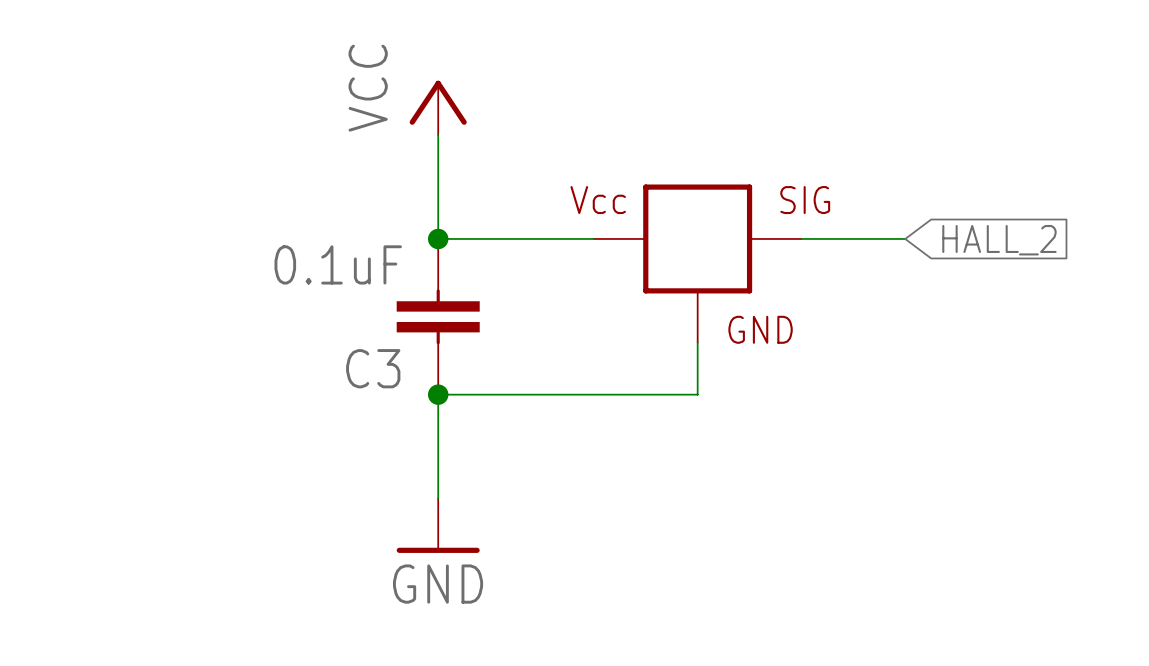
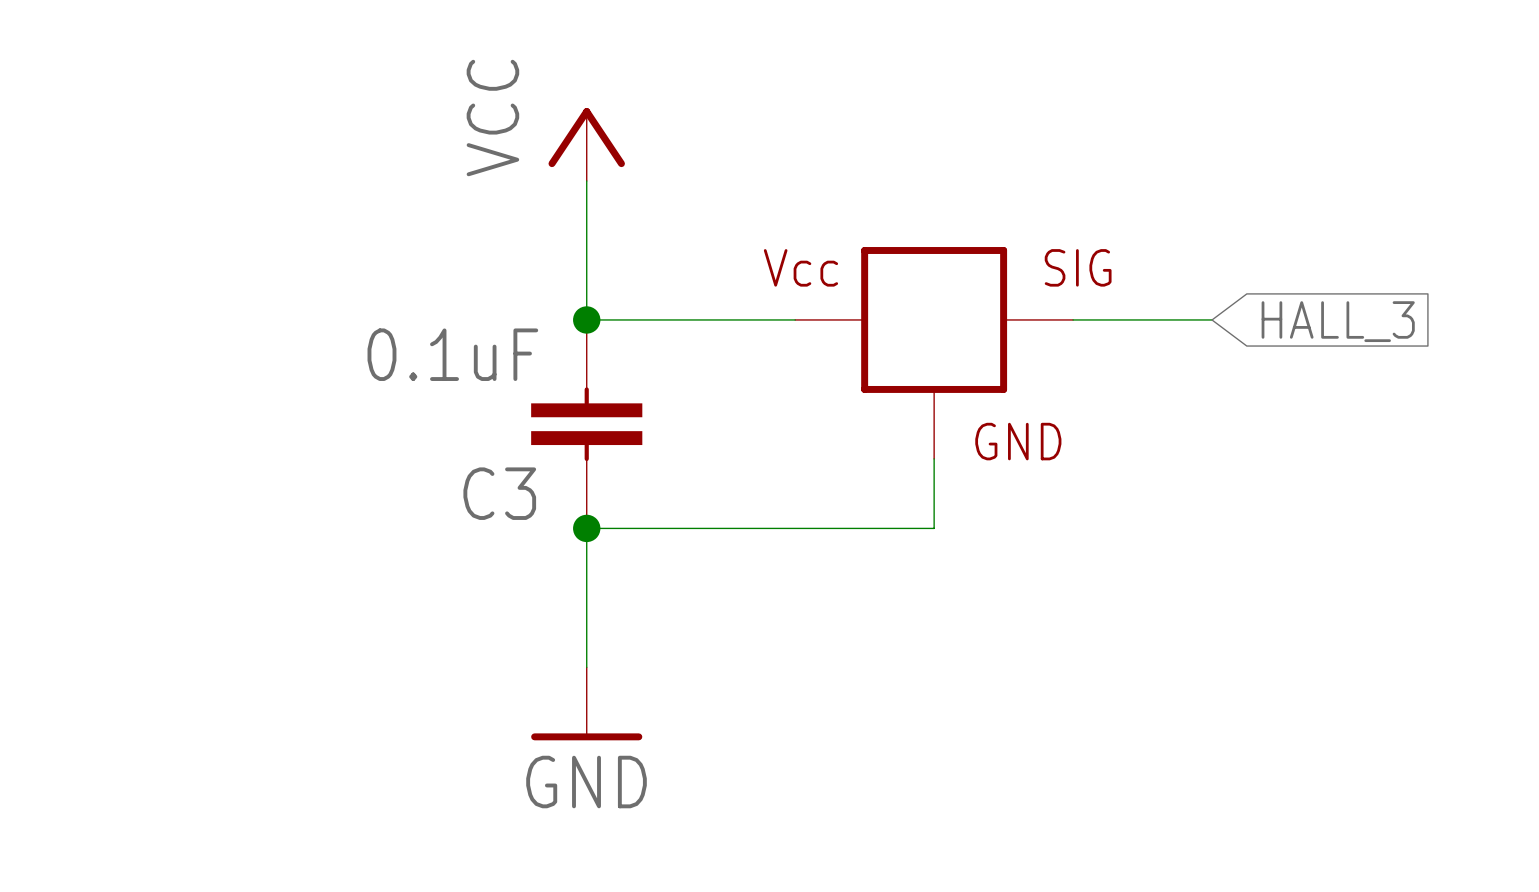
global label: HALL_2 (999, 240) -> HALL_3 (1338, 321)

